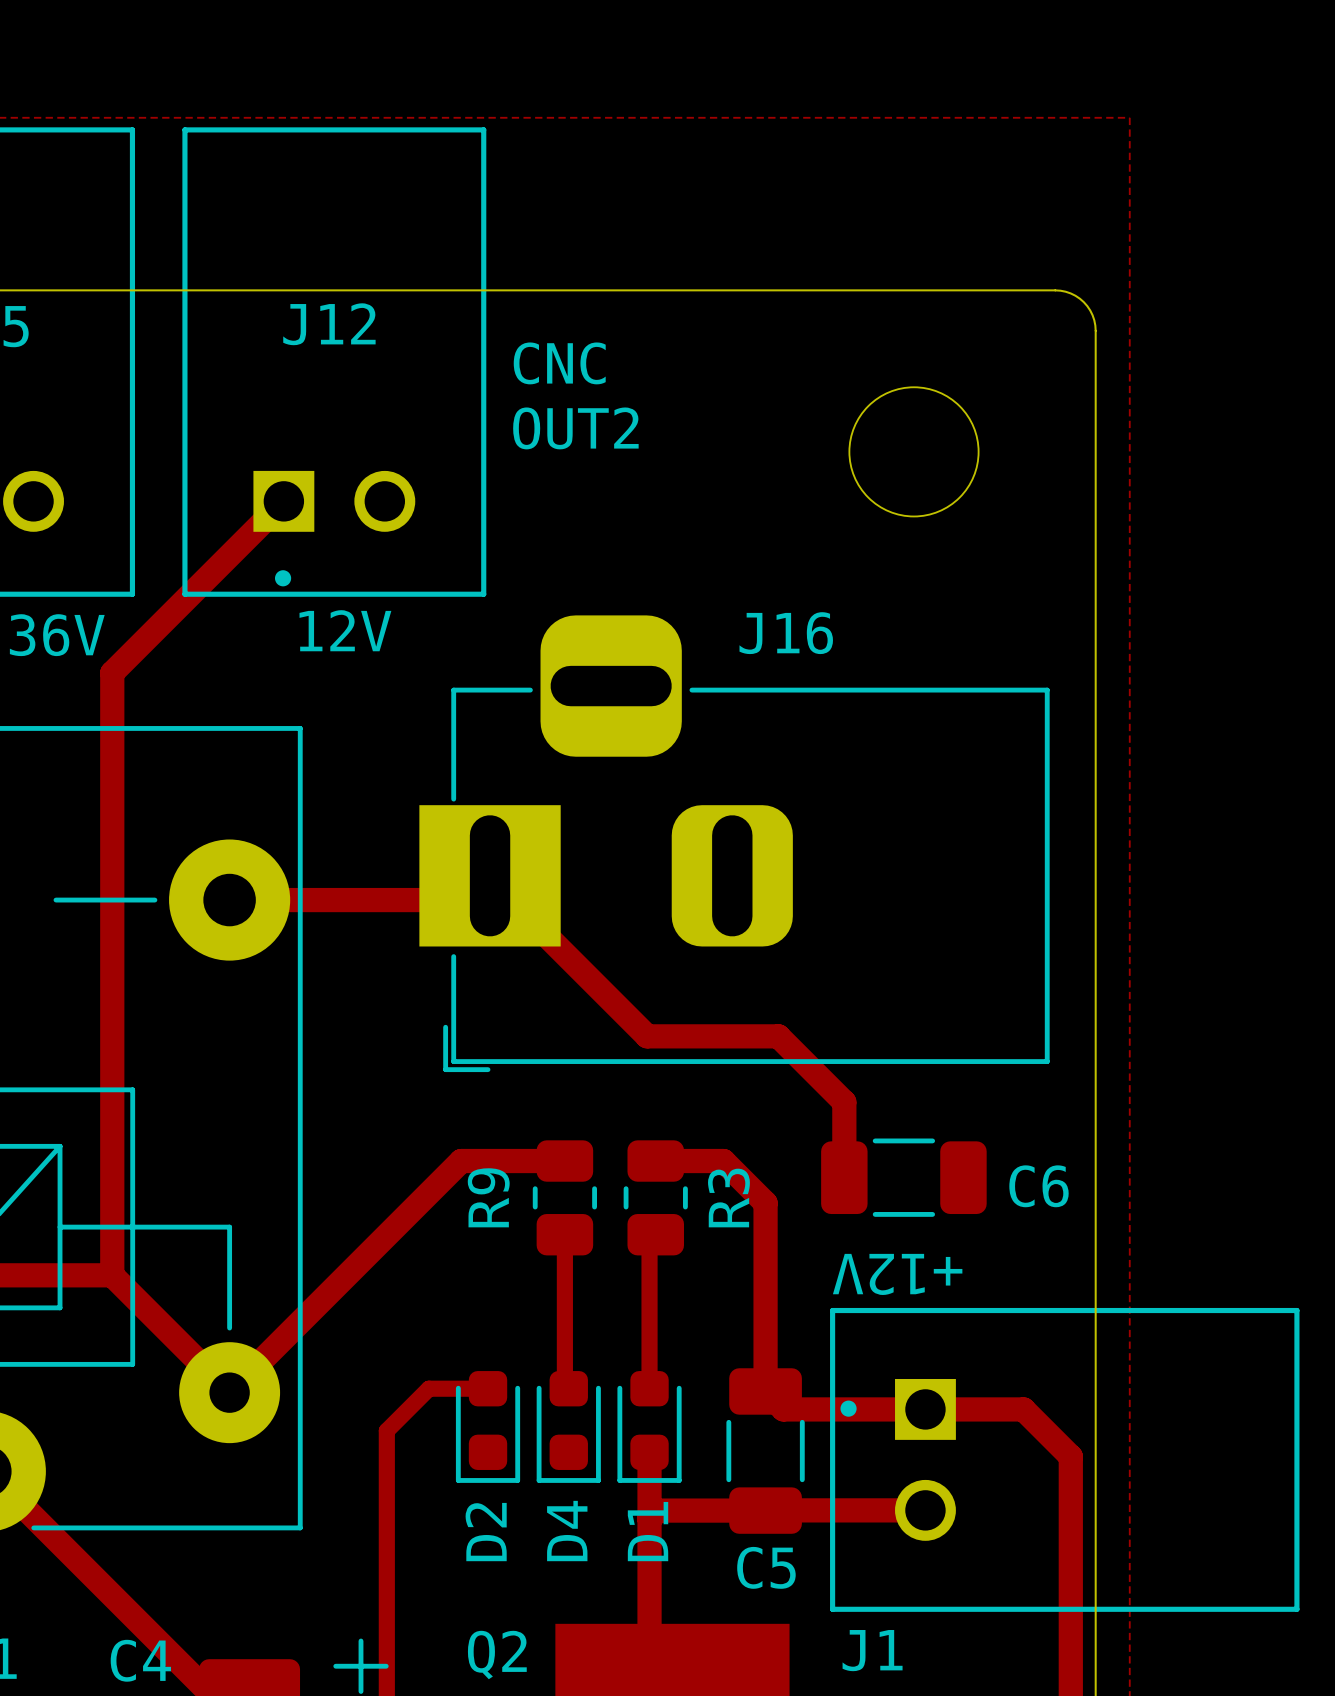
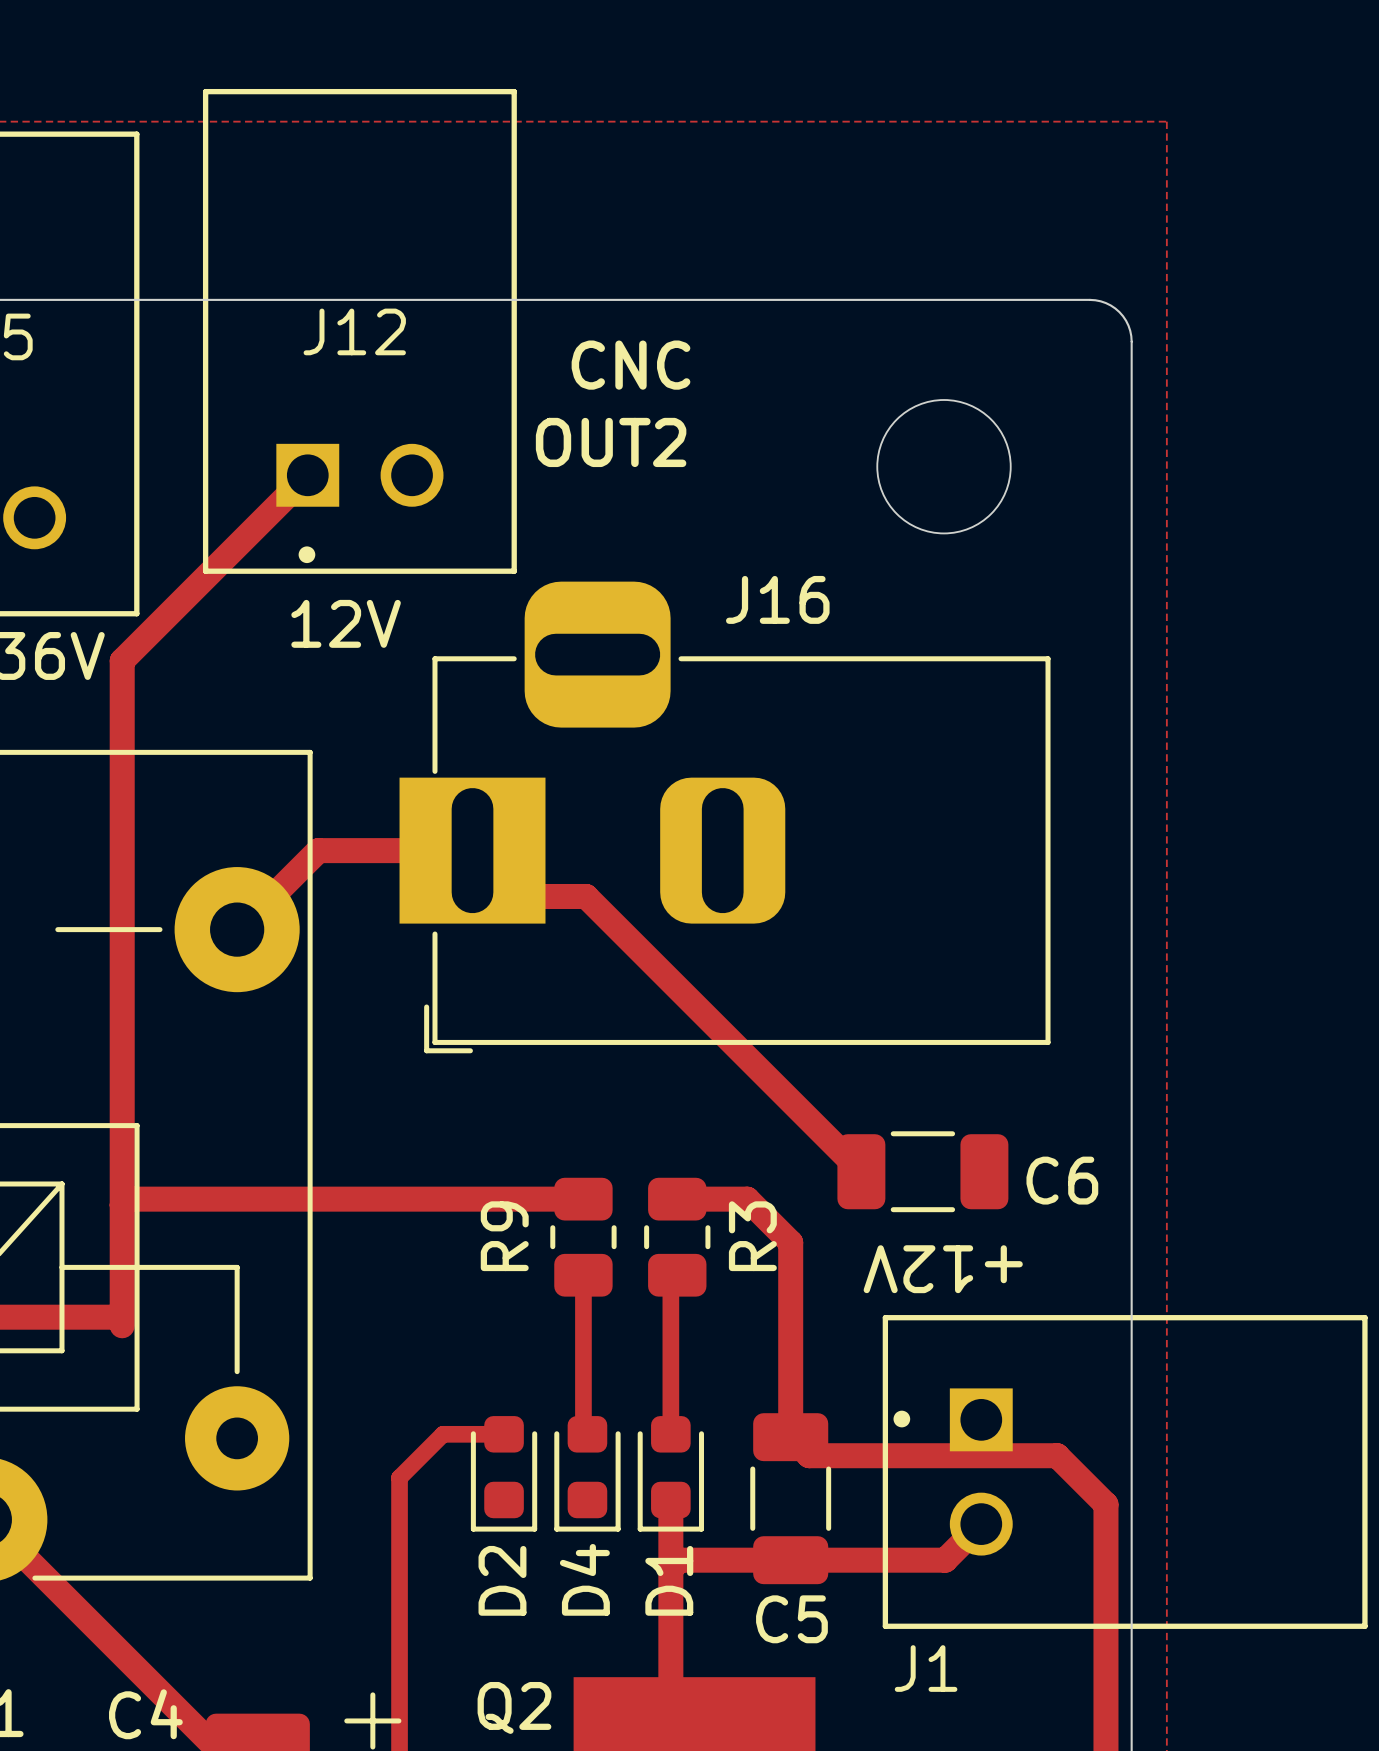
J12 name position: J12 (329, 324) -> J12 (354, 331)
J12 position: (334, 362) -> (359, 331)
text position: CNC (559, 363) -> CNC (630, 365)
track: none -> (307, 475) (122, 660) (122, 1325)
track: (283, 501) (112, 672) (112, 1275) (229, 1392) (461, 1161) -> (122, 1205) (128, 1199) (476, 1199)
text position: 12V (345, 630) -> 12V (346, 623)
J16 position: (734, 843) -> (725, 817)
track: (229, 900) (465, 900) (490, 875) (490, 879) (647, 1036) (778, 1036) (844, 1102) (844, 1177) -> none
track: none -> (237, 931) (318, 850) (472, 850) (472, 896) (586, 896) (861, 1171)
C6 position: (903, 1177) -> (922, 1171)
text position: +12V (897, 1274) -> +12V (943, 1269)
J1 position: (1064, 1459) -> (1125, 1471)
track: none -> (981, 1524) (945, 1560) (790, 1560)
track: (925, 1510) (765, 1510) (757, 1519) -> none

